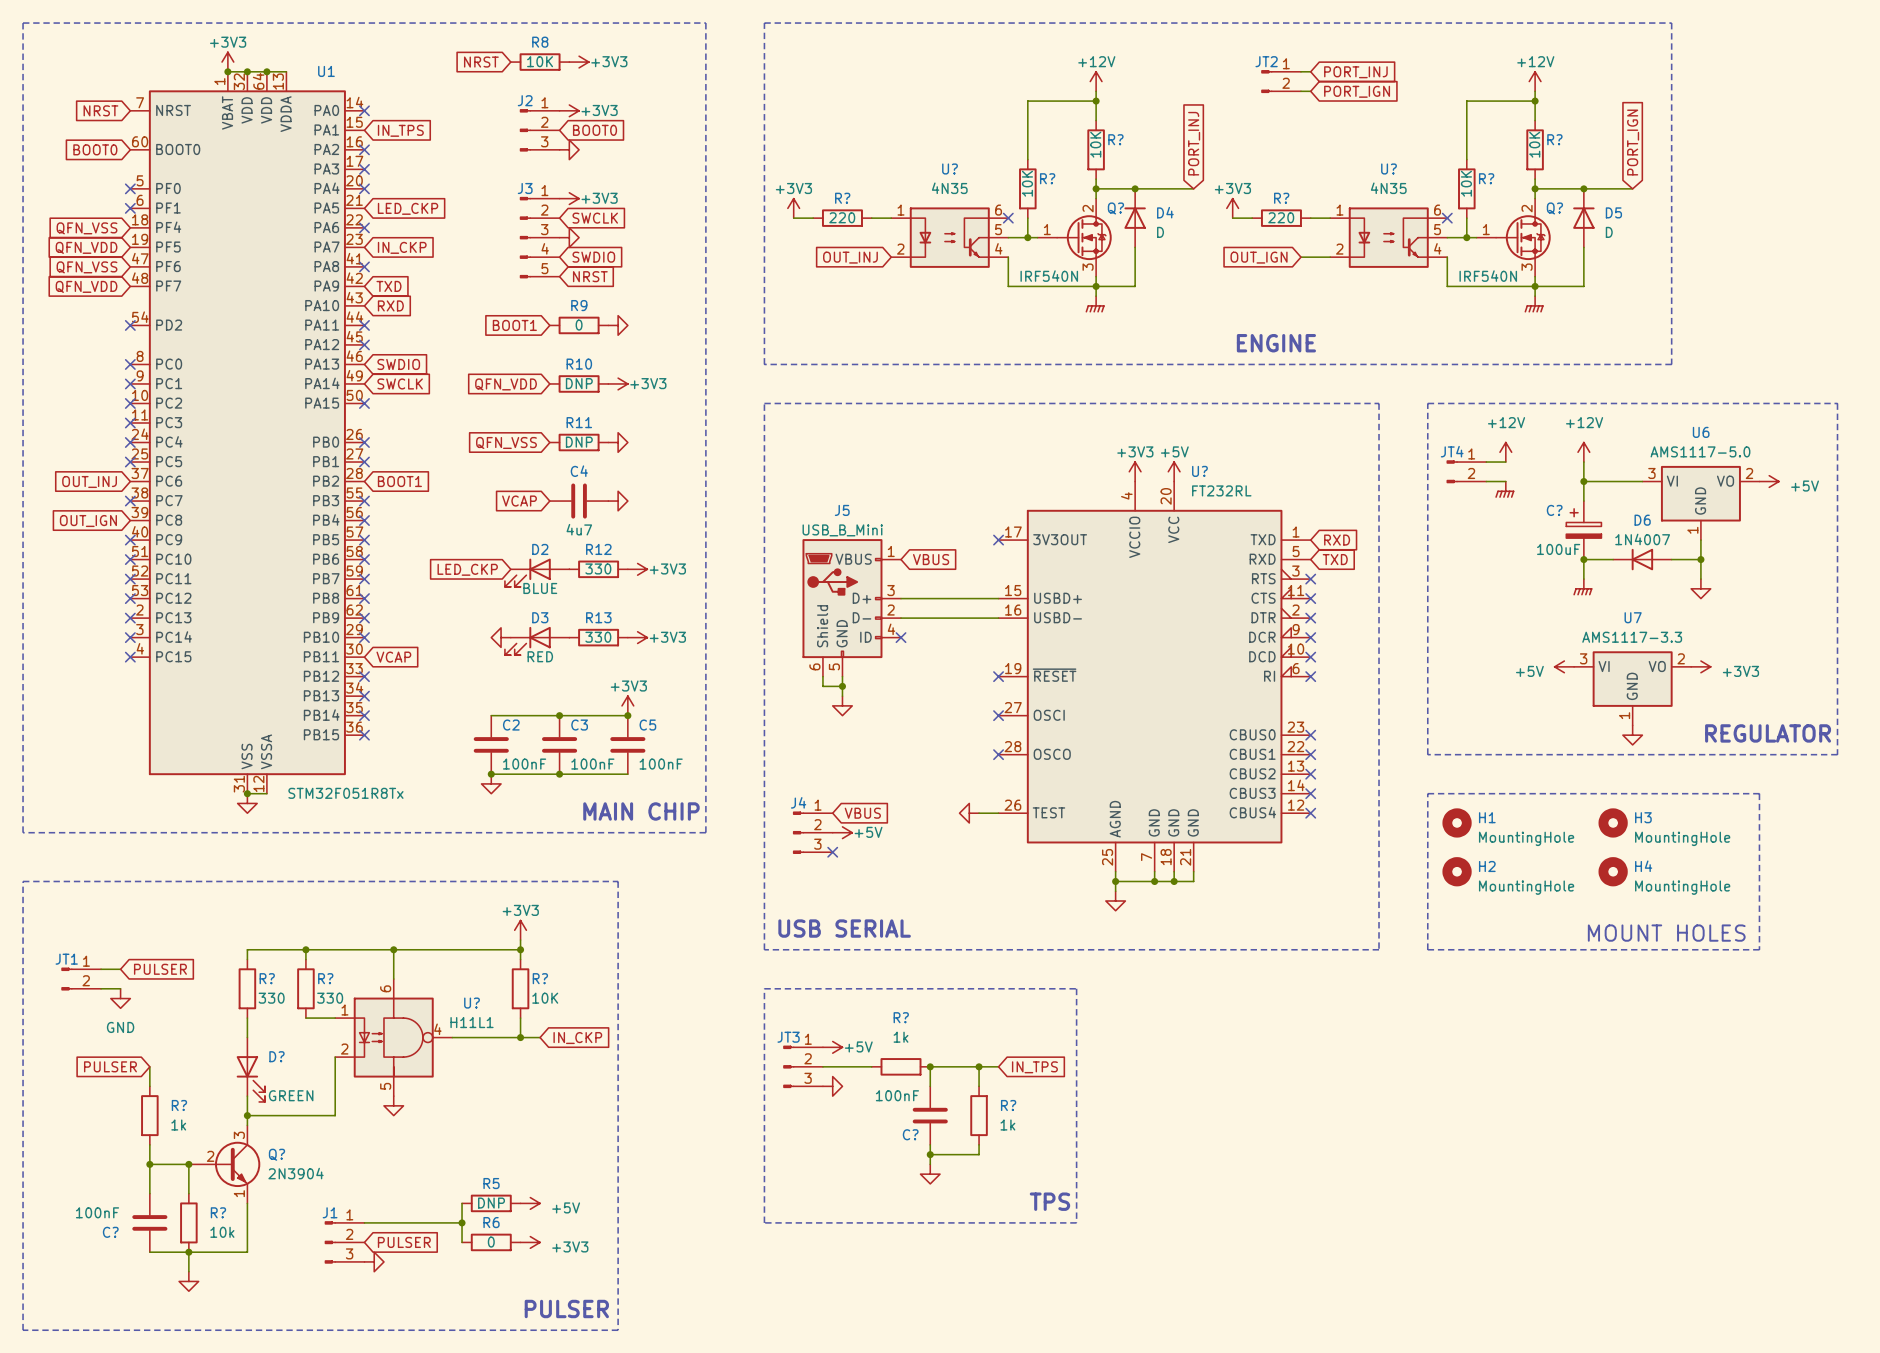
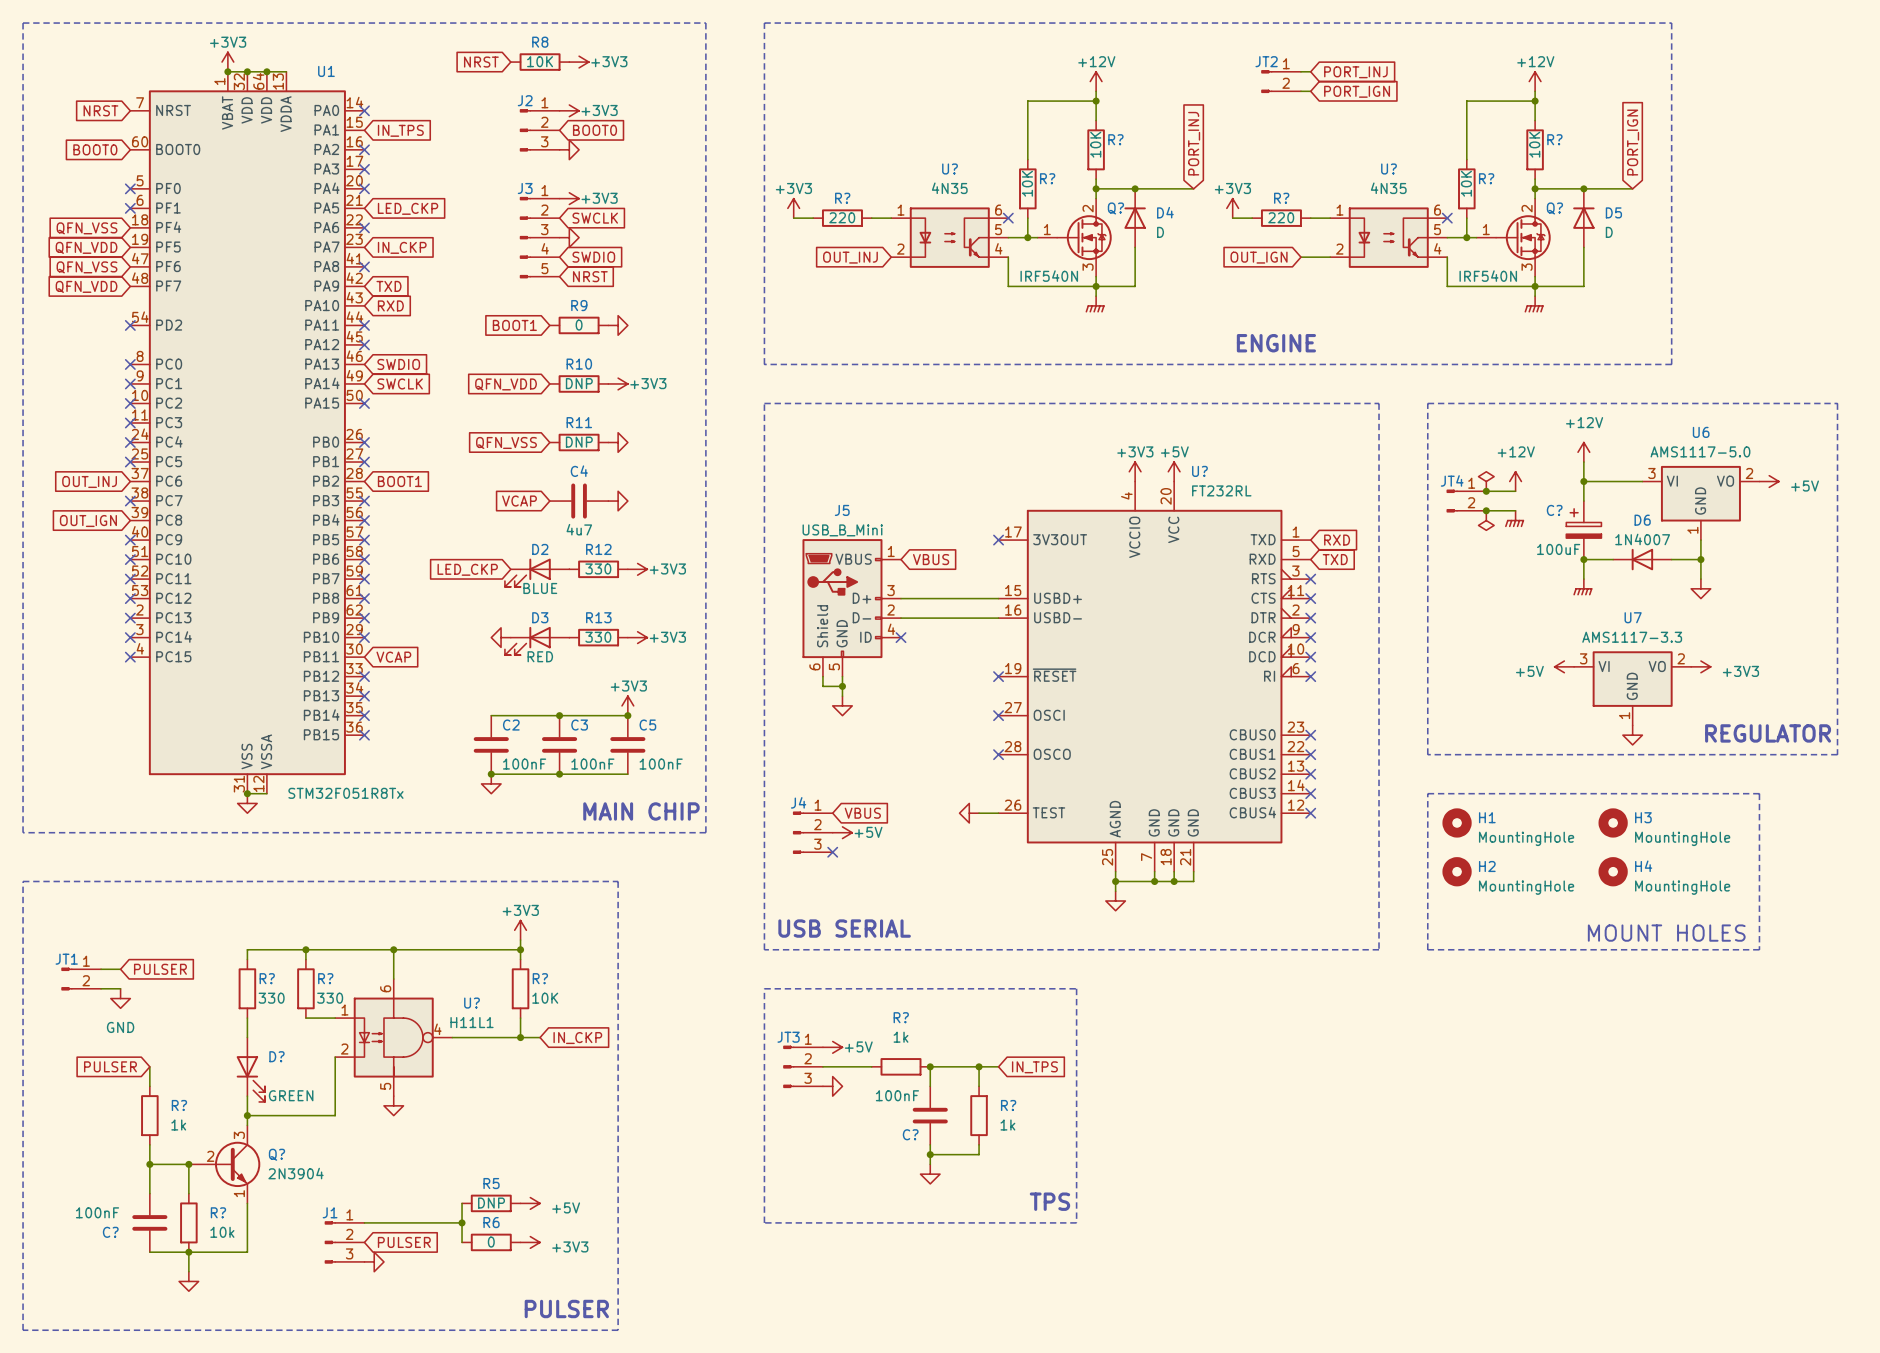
power symbol position: +12V (1505, 452) -> +12V (1515, 481)
wire: (1486, 462) (1505, 462) -> none
JT4 position: (1466, 471) -> (1466, 501)
wire: (1486, 481) (1505, 481) -> none
power symbol: none -> (1486, 481)
power symbol position: (1504, 489) -> (1514, 518)
junction: none -> (1486, 491)
wire: none -> (1486, 510) (1515, 510)
junction: none -> (1486, 510)
power symbol: none -> (1486, 520)

